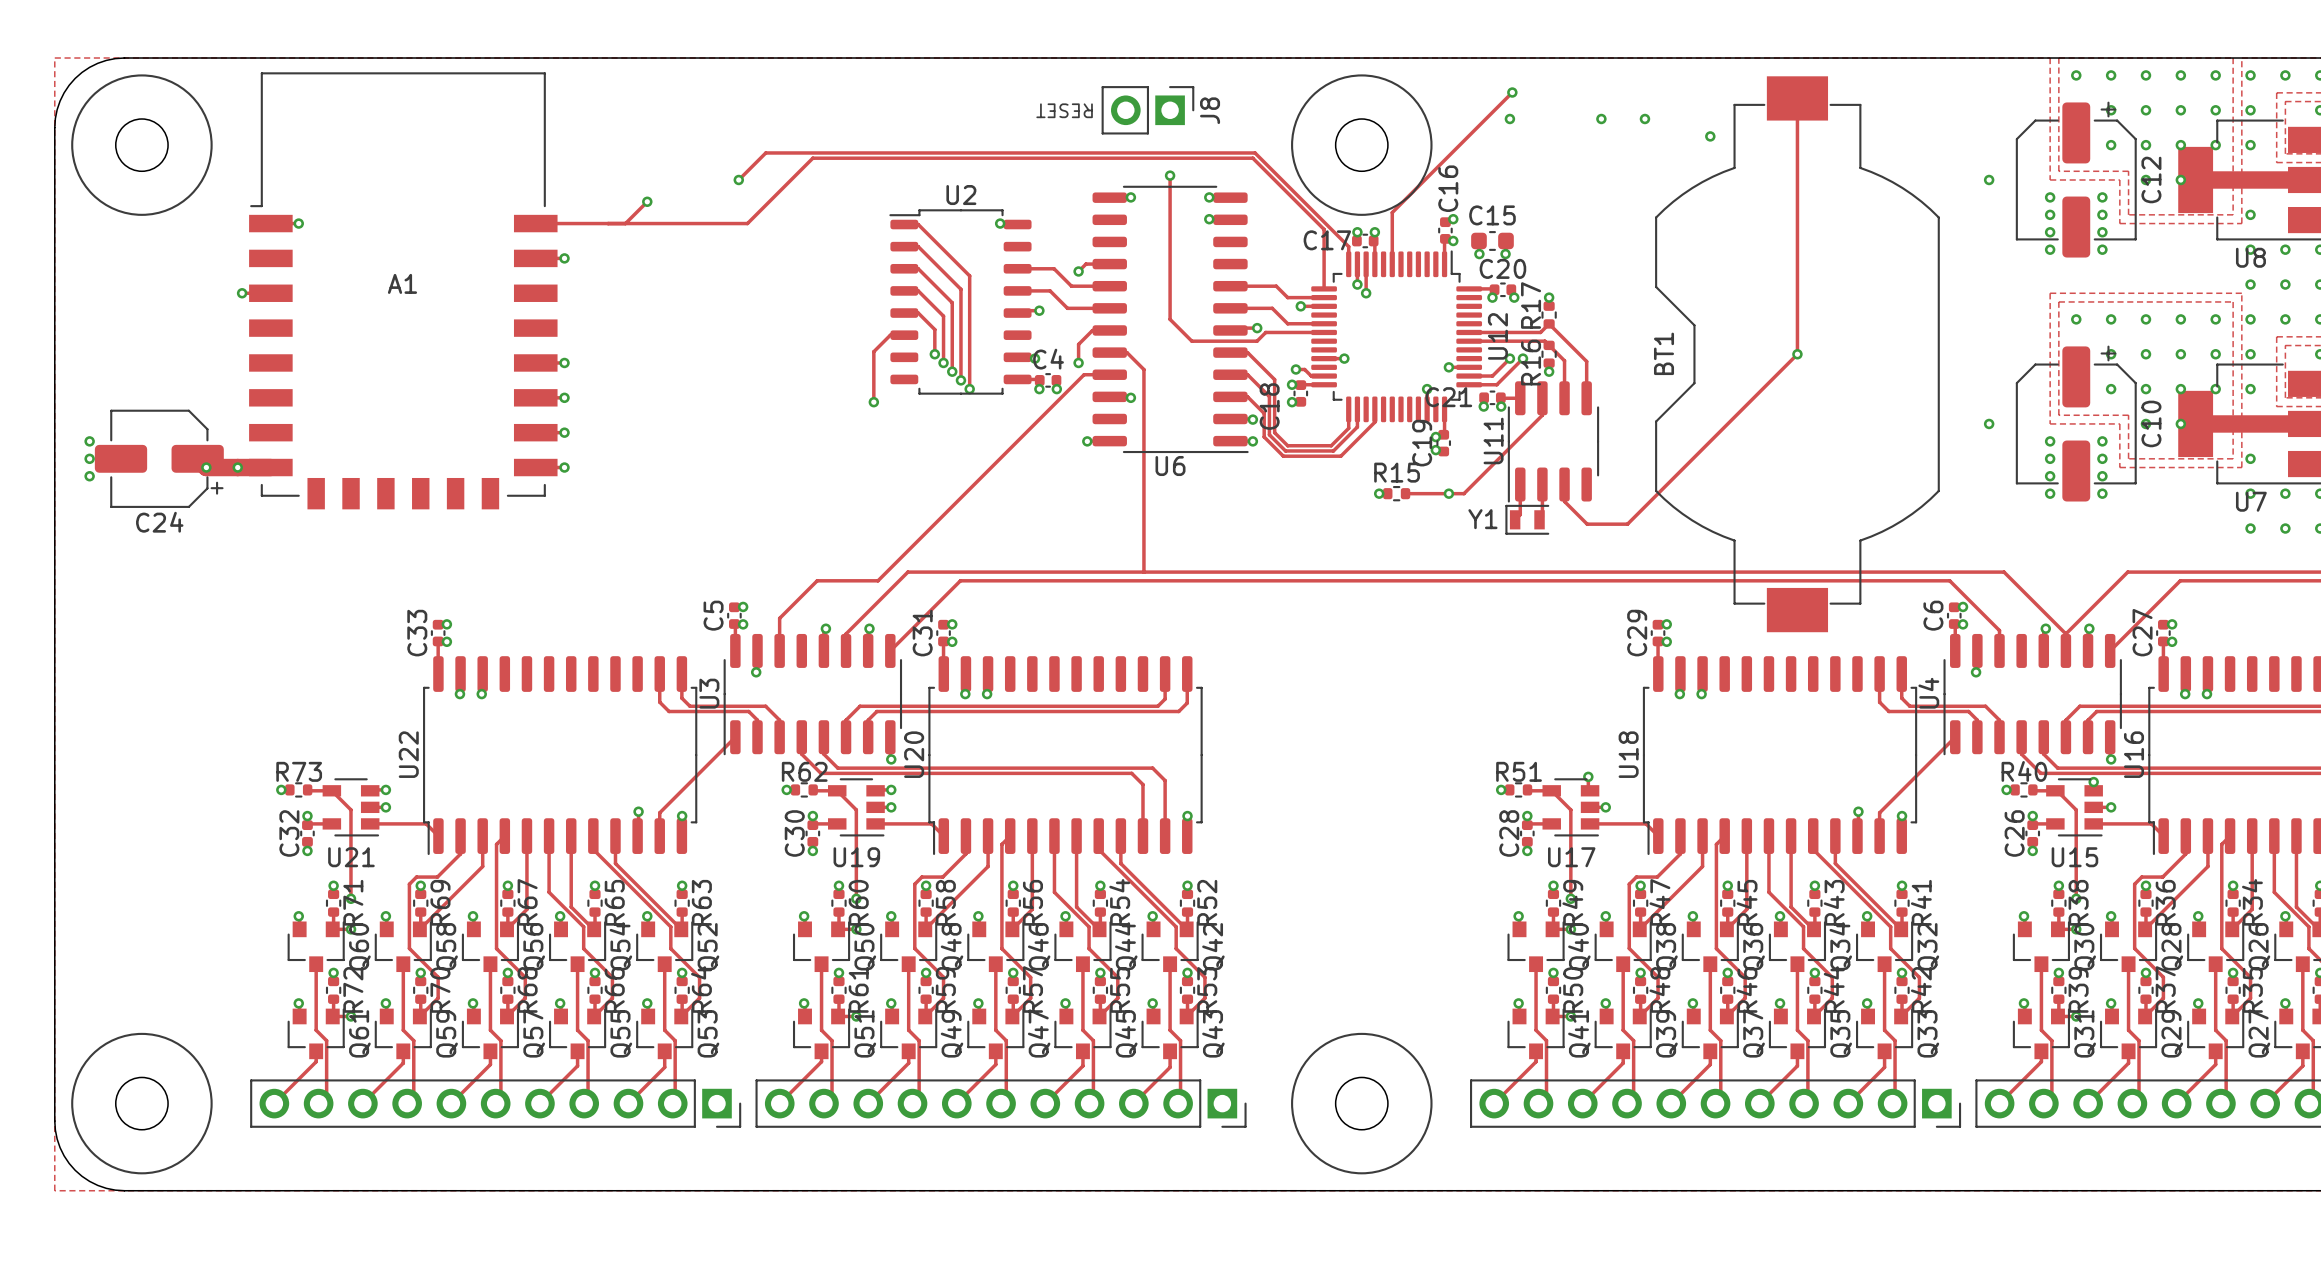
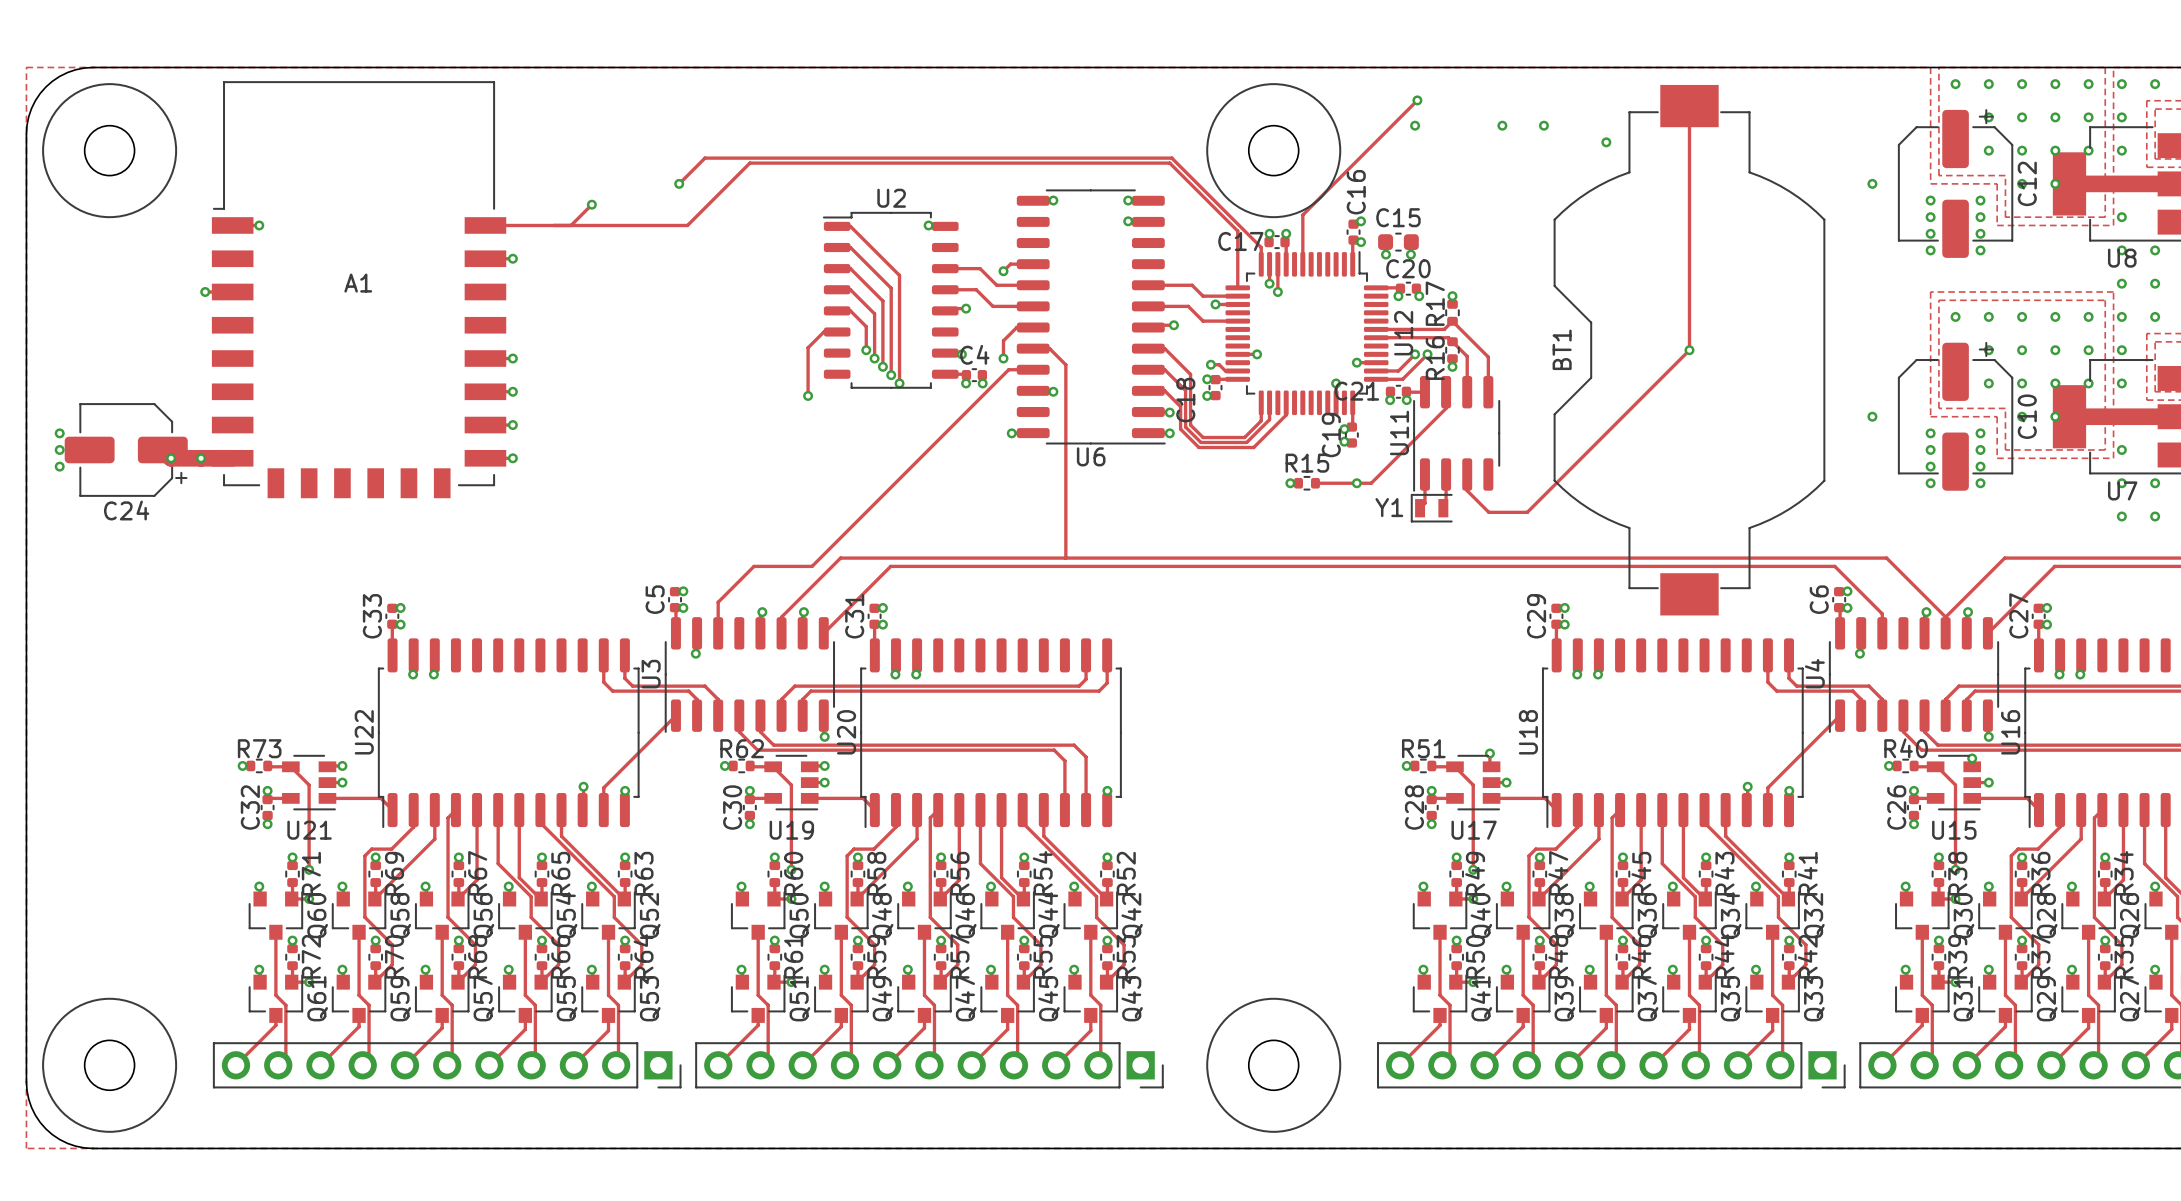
text: RESET (1064, 110) -> none
J8: (1147, 110) -> none
track: (1170, 175) (1170, 319) (1191, 341) (1257, 341) (1265, 332) (1324, 332) -> none
via: (1170, 175) -> none

